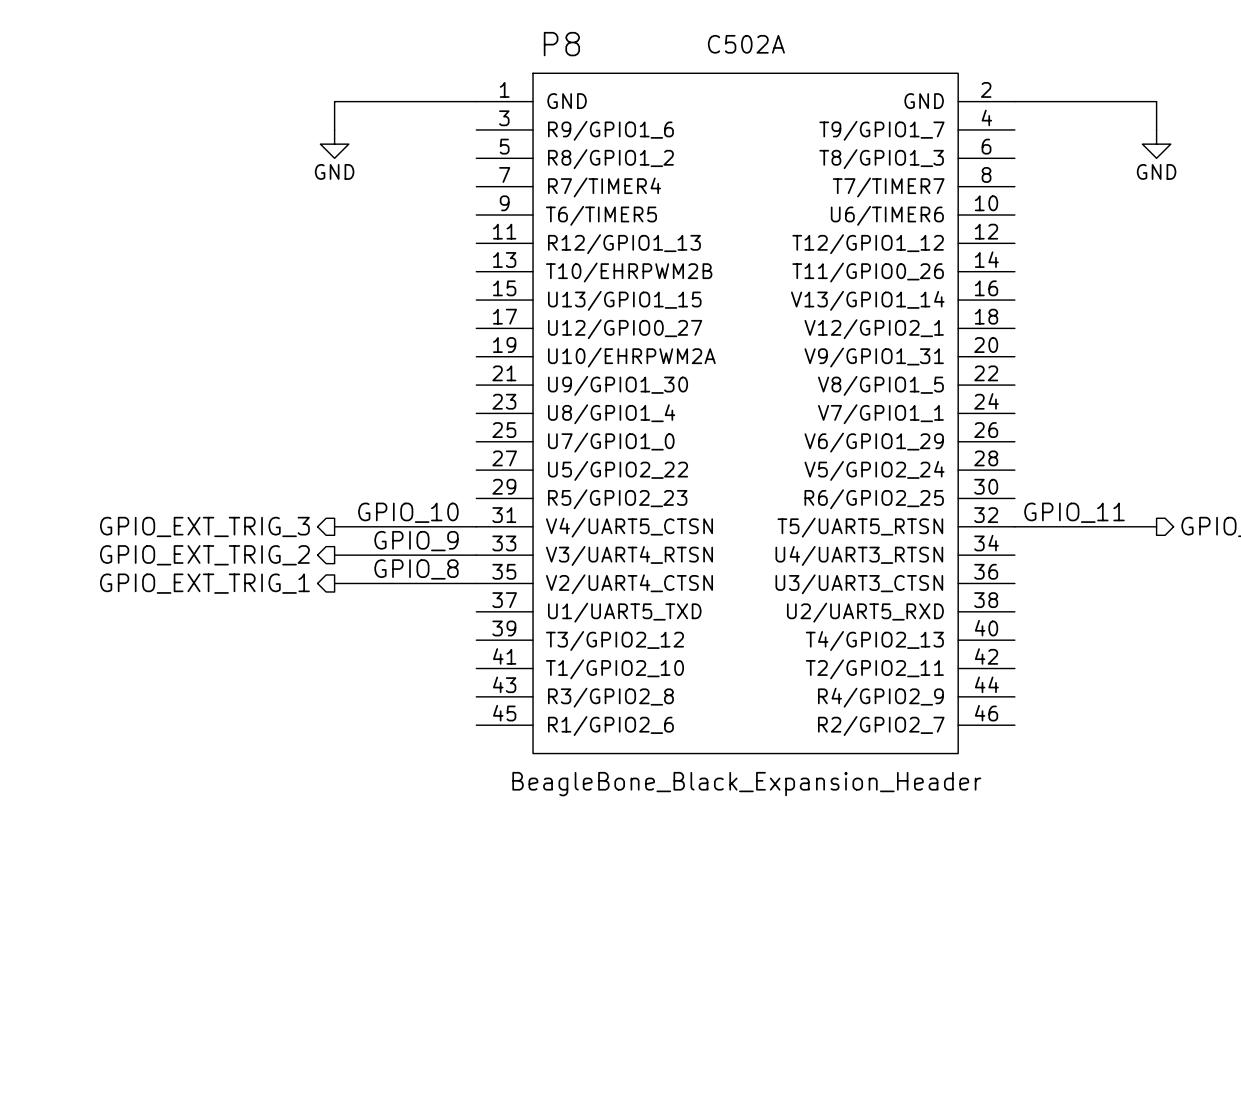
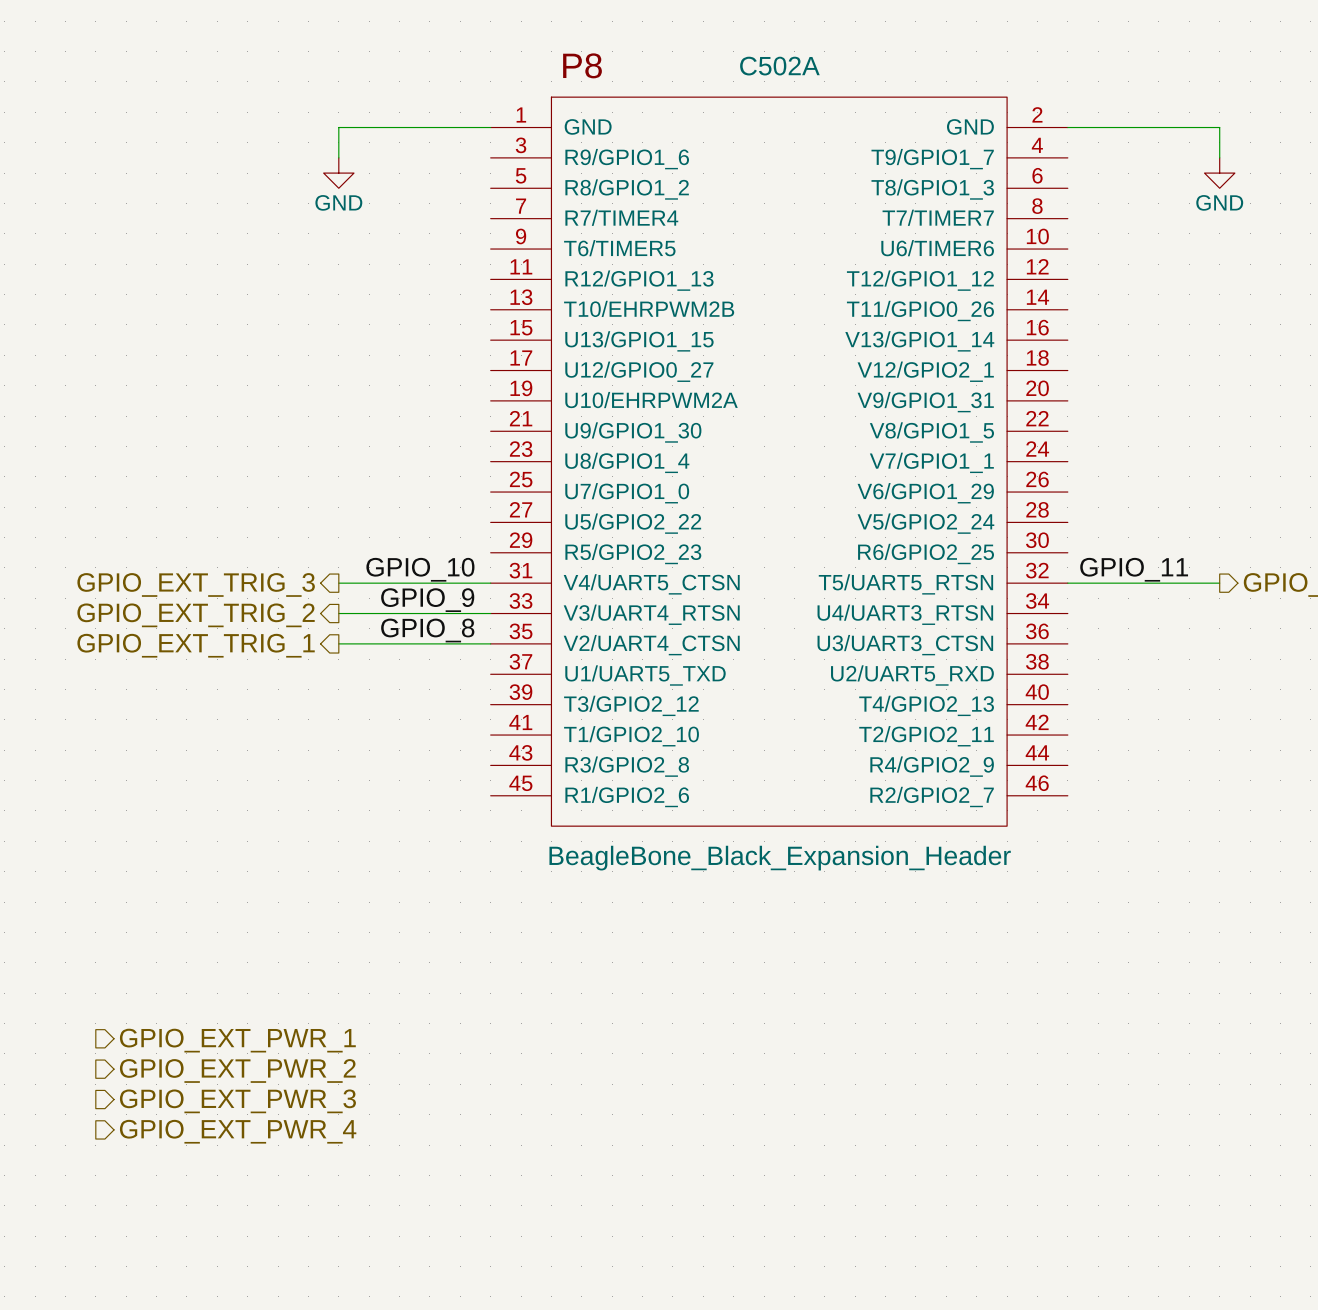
hierarchical label: none -> GPIO_EXT_PWR_1 (237, 1040)
hierarchical label: none -> GPIO_EXT_PWR_2 (237, 1070)
hierarchical label: none -> GPIO_EXT_PWR_3 (237, 1101)
hierarchical label: none -> GPIO_EXT_PWR_4 (238, 1131)

